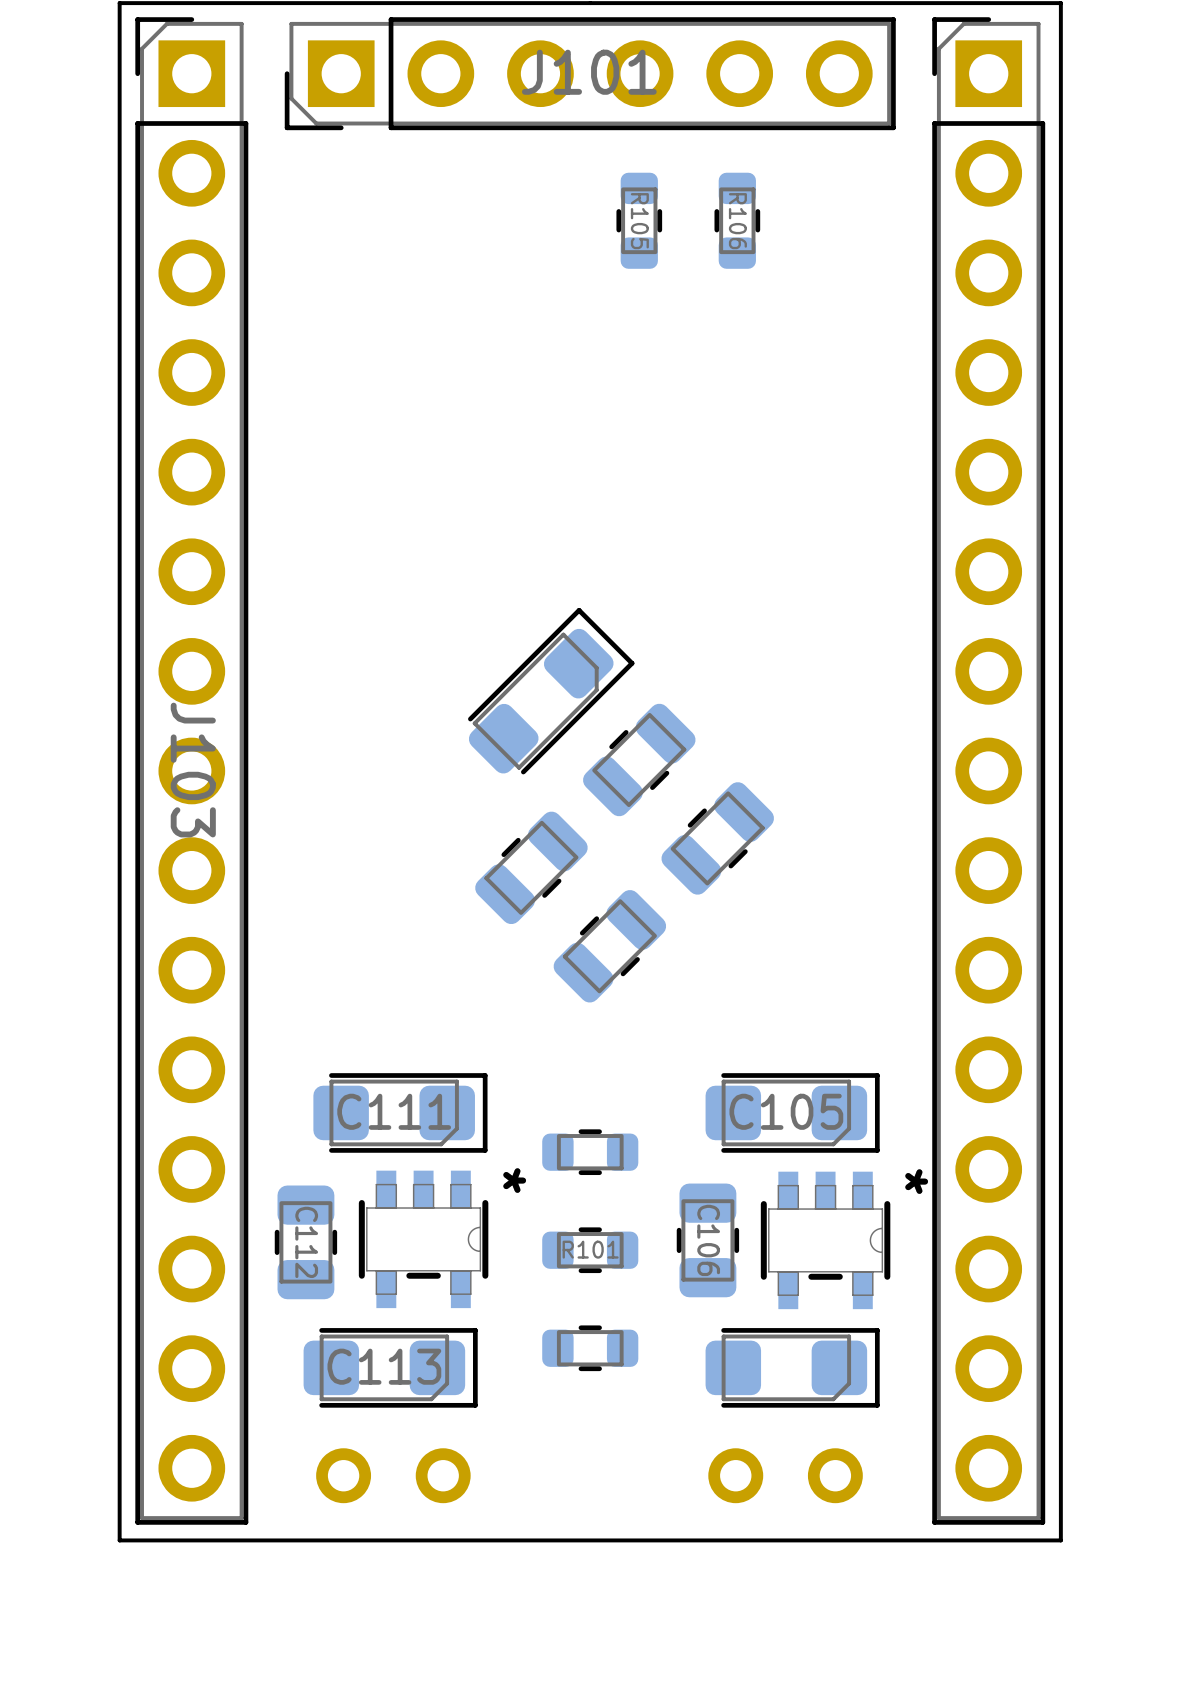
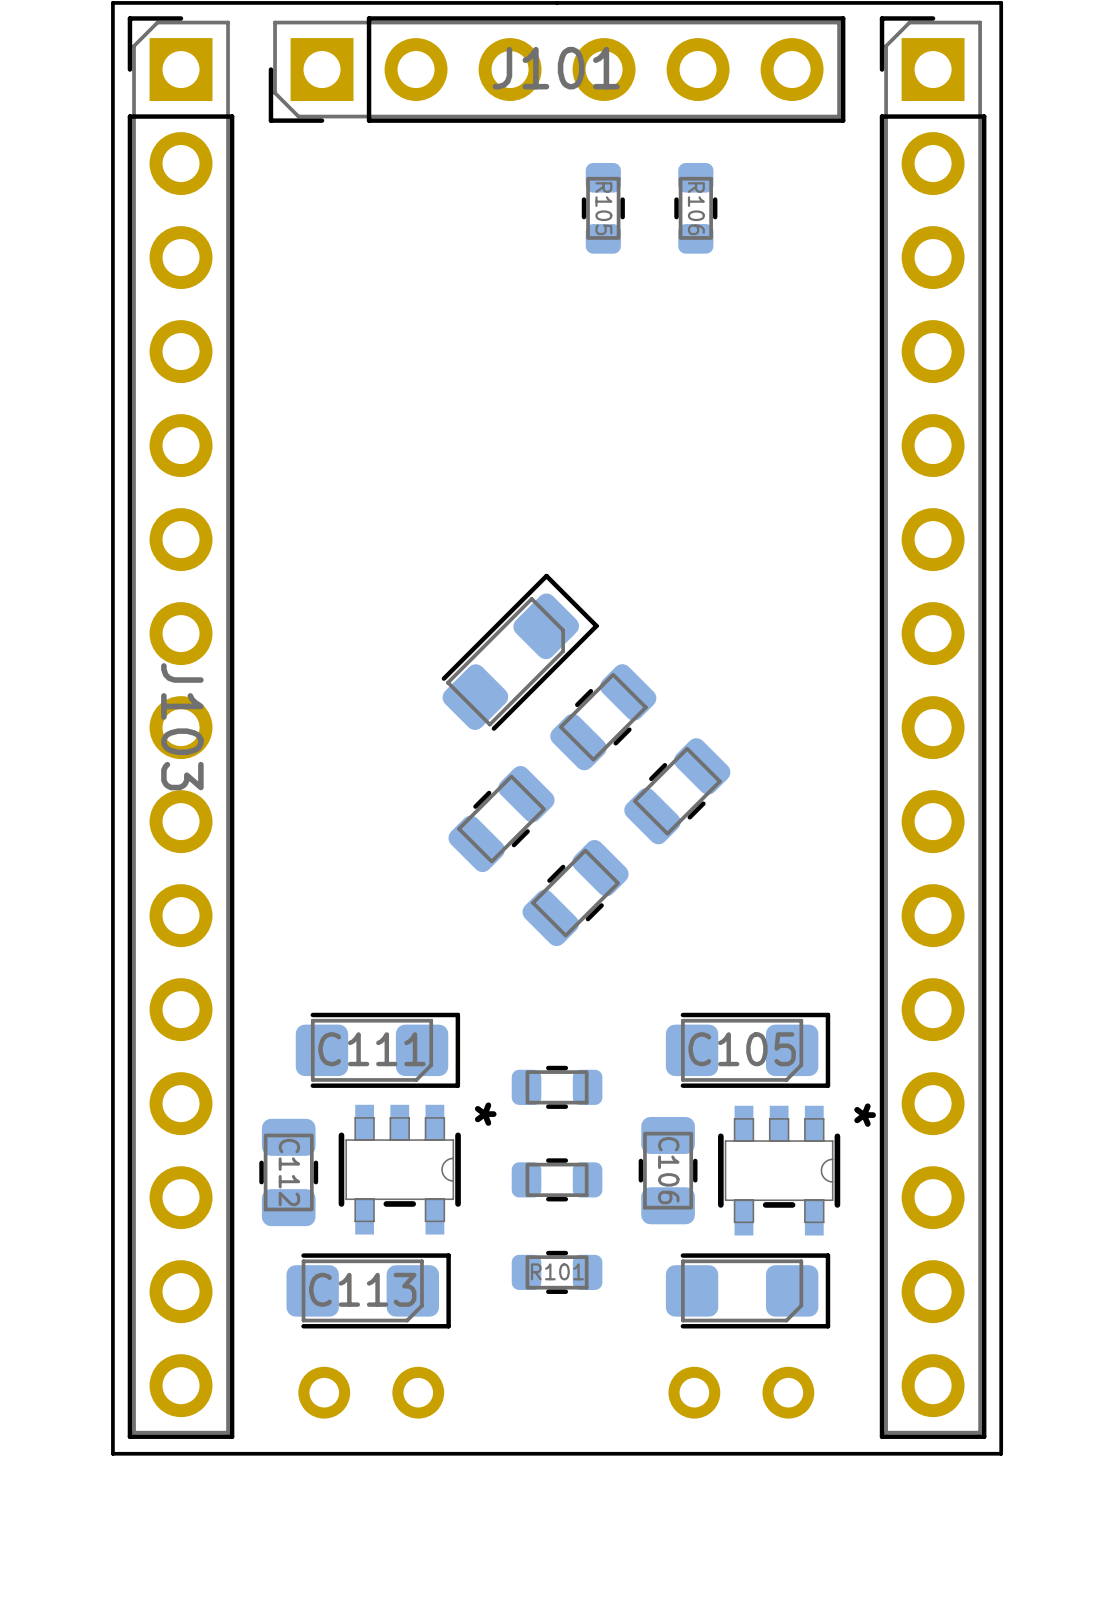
R101 name: R101 (590, 1249) -> none
R101 name: none -> R101 (557, 1271)

